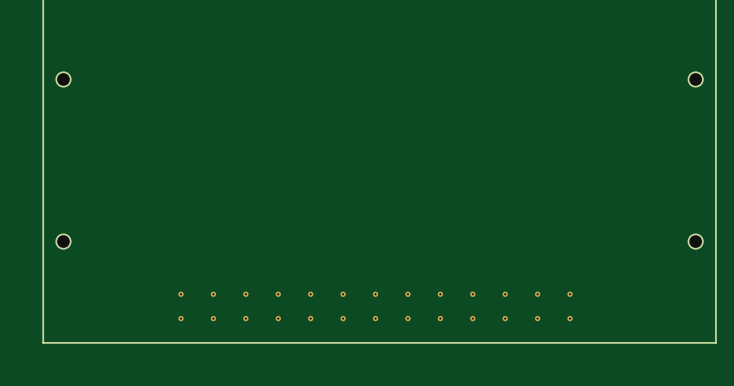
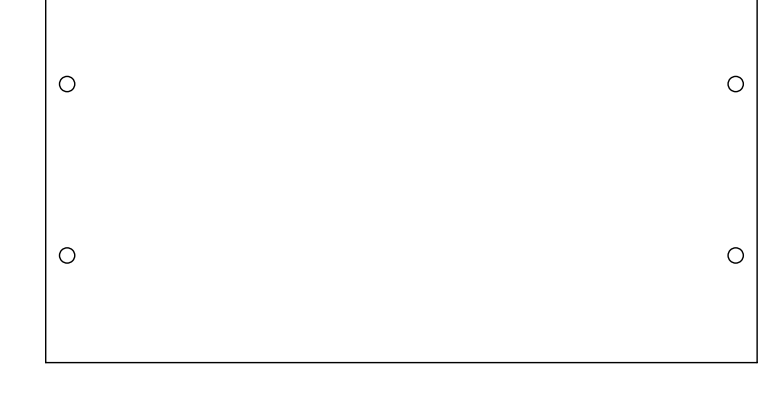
via: (181, 294) -> none
via: (213, 294) -> none
via: (245, 294) -> none
via: (278, 294) -> none
via: (310, 294) -> none
via: (343, 294) -> none
via: (375, 294) -> none
via: (407, 294) -> none
via: (440, 294) -> none
via: (472, 294) -> none
via: (505, 294) -> none
via: (537, 294) -> none
via: (570, 294) -> none
via: (181, 318) -> none
via: (213, 318) -> none
via: (245, 318) -> none
via: (278, 318) -> none
via: (310, 318) -> none
via: (343, 318) -> none
via: (375, 318) -> none
via: (407, 318) -> none
via: (440, 318) -> none
via: (472, 318) -> none
via: (505, 318) -> none
via: (537, 318) -> none
via: (570, 318) -> none

